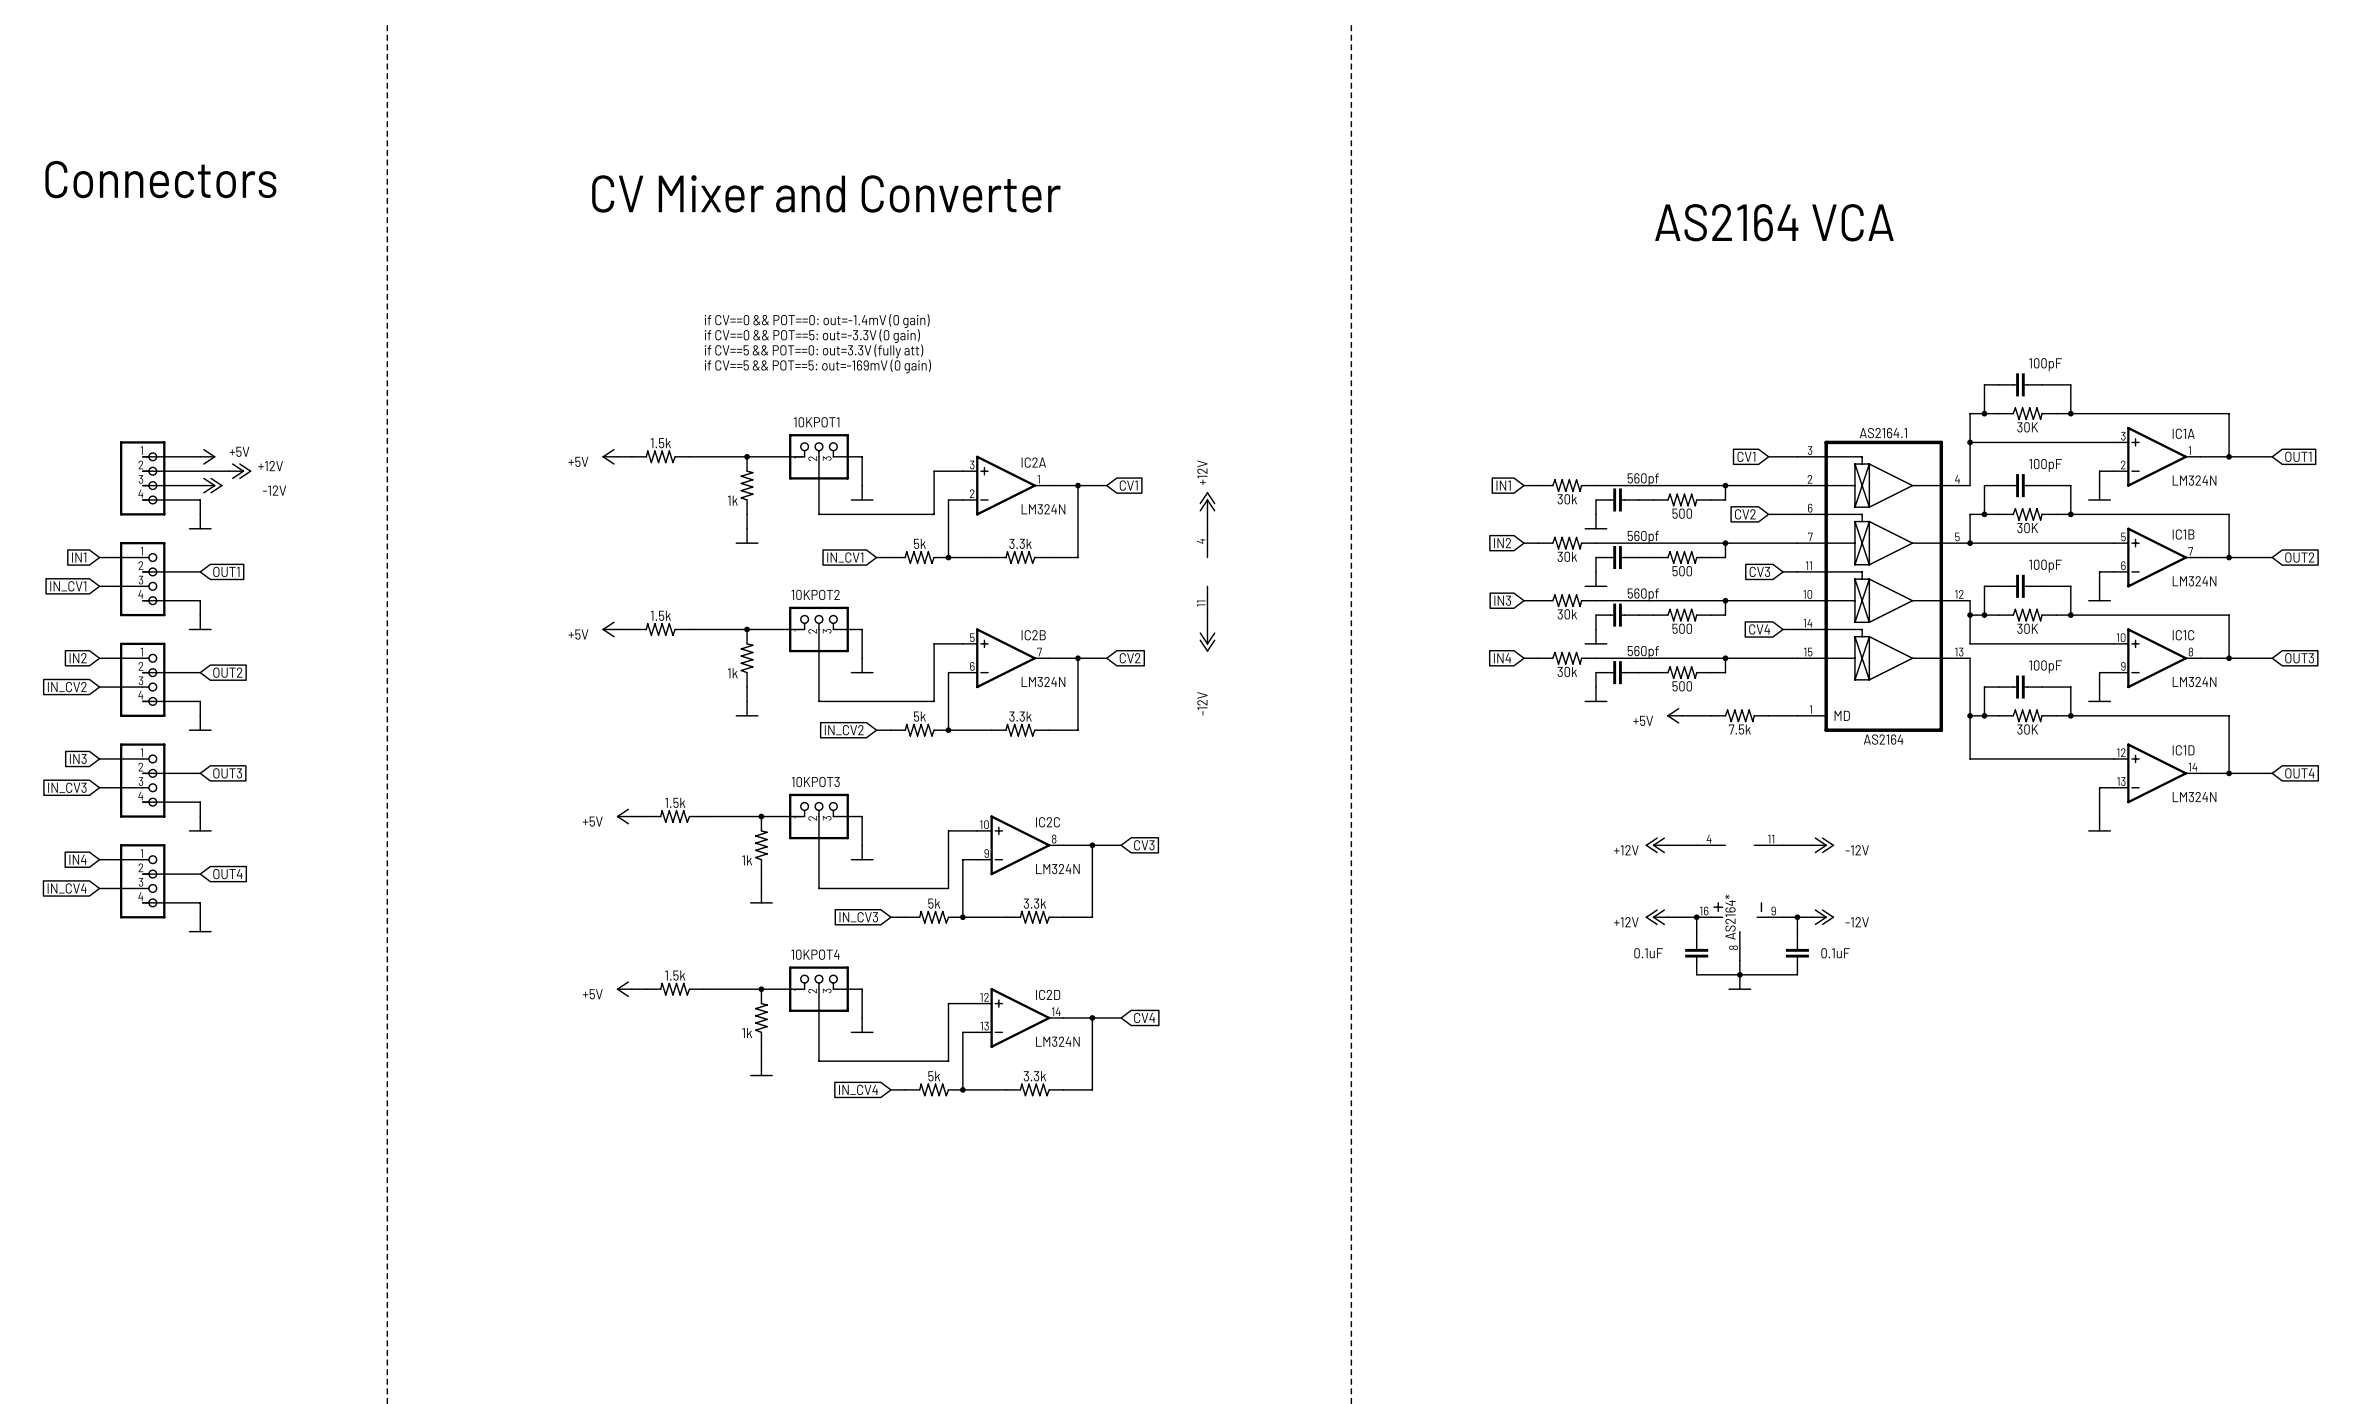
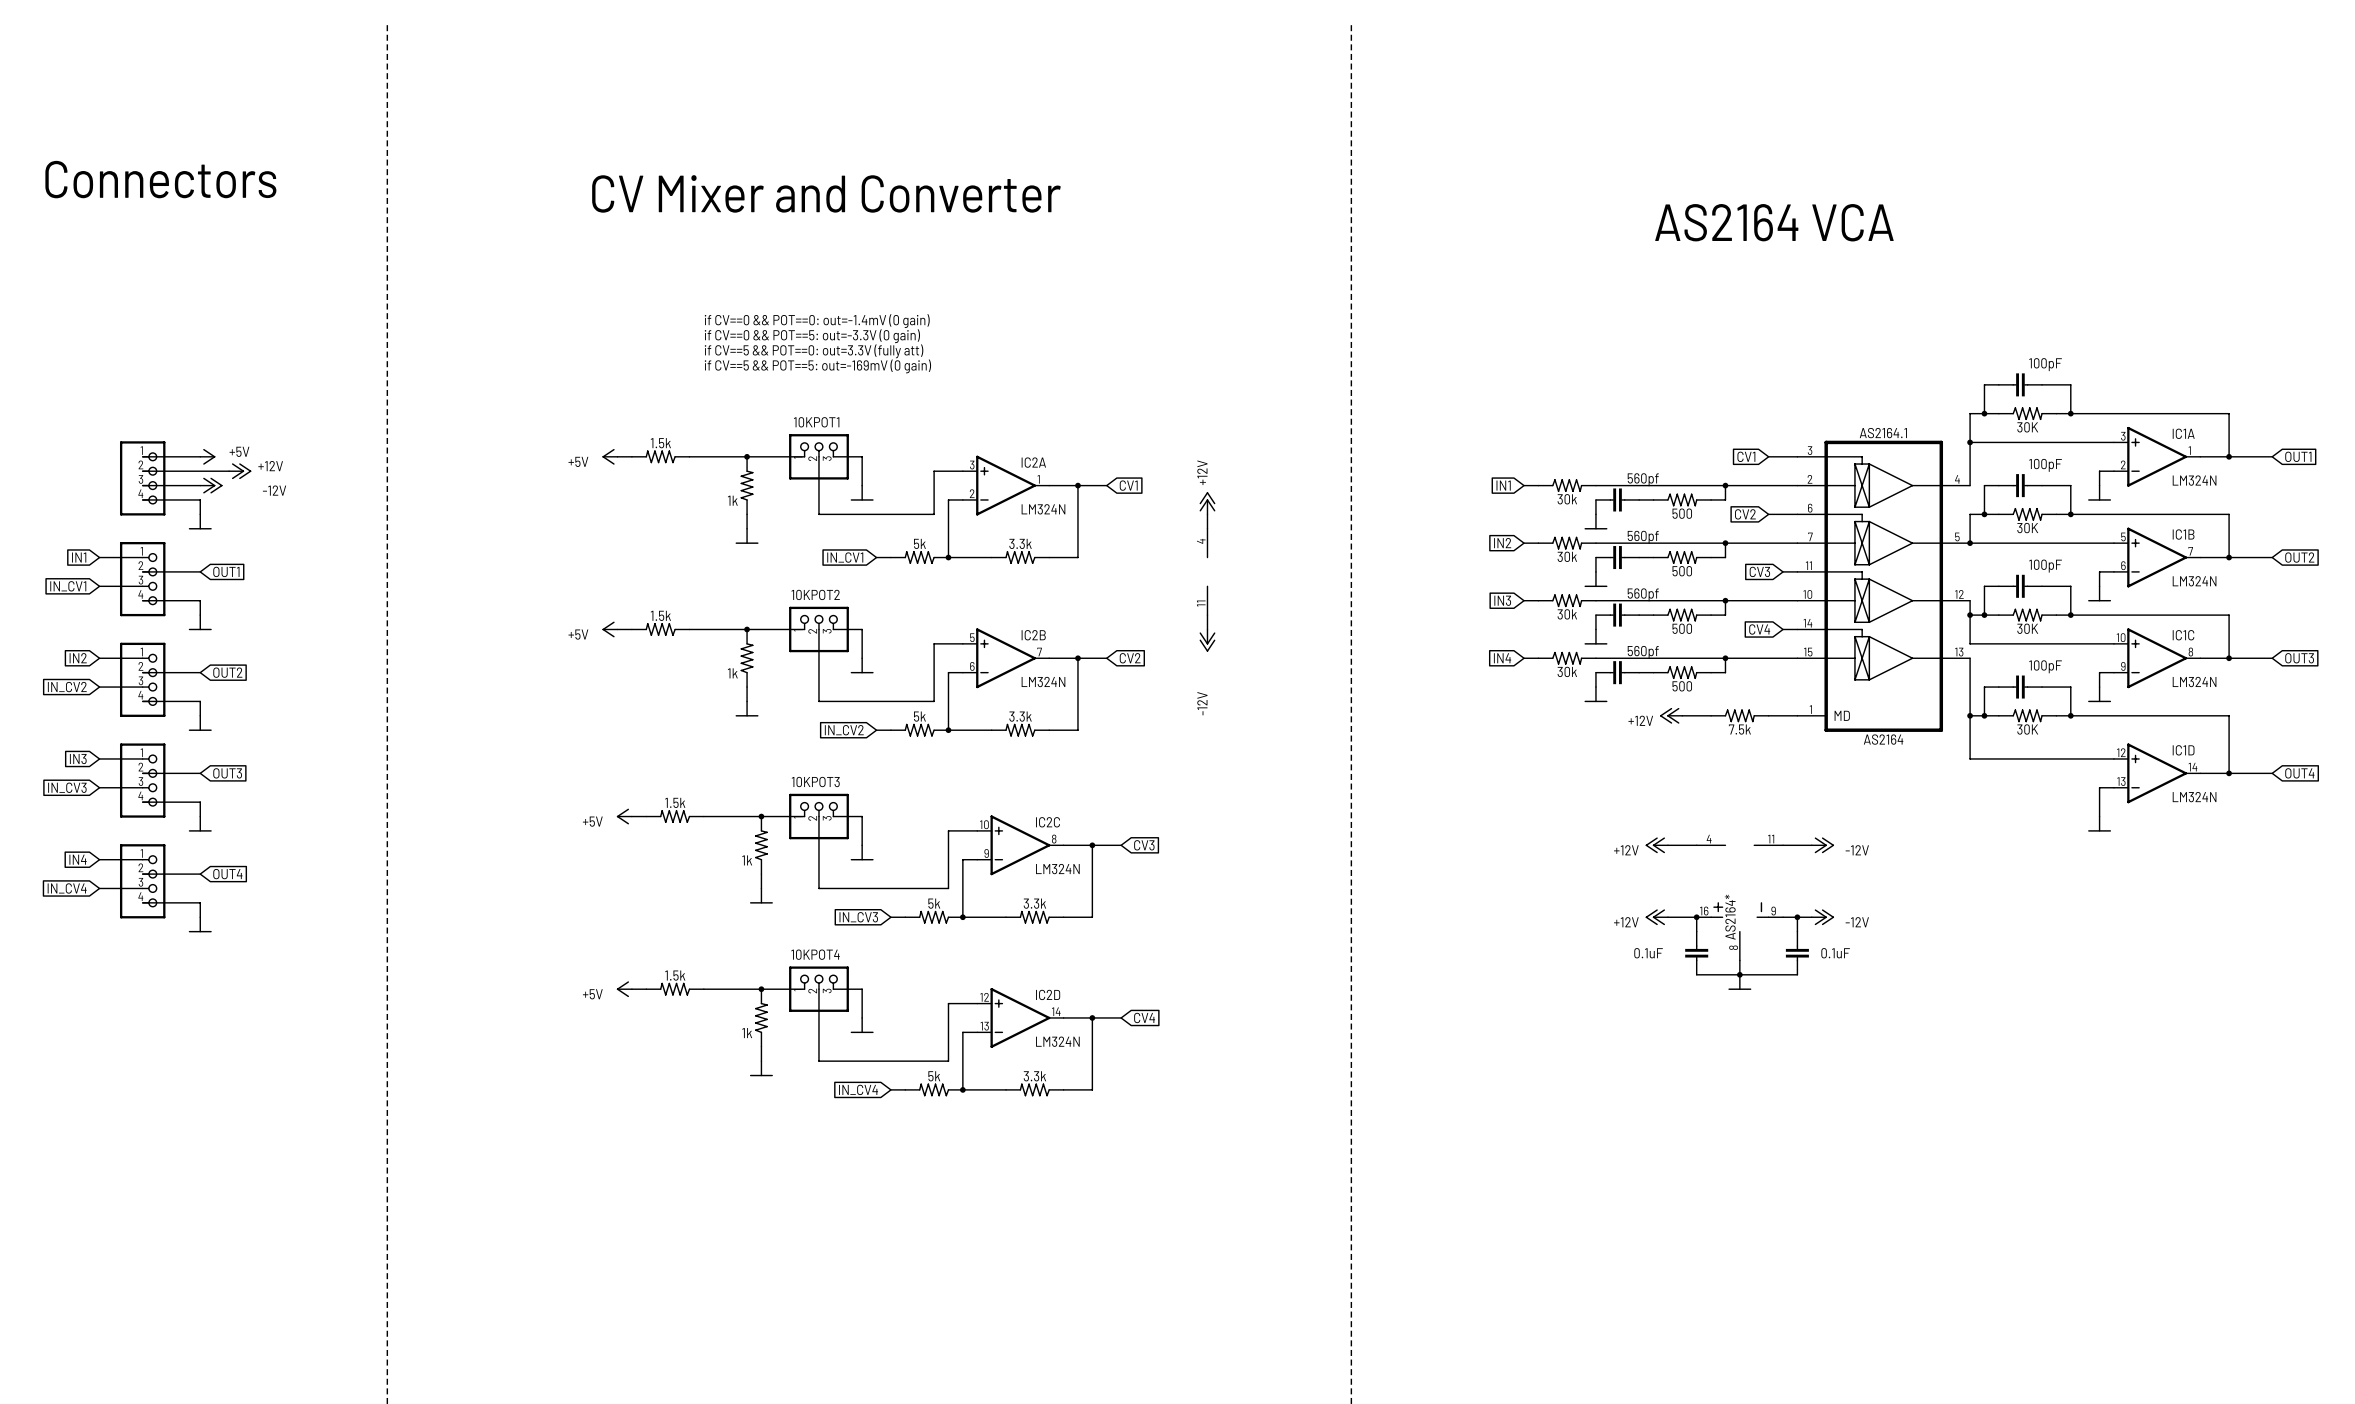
power symbol: +5V (1674, 715) -> +12V (1671, 715)

